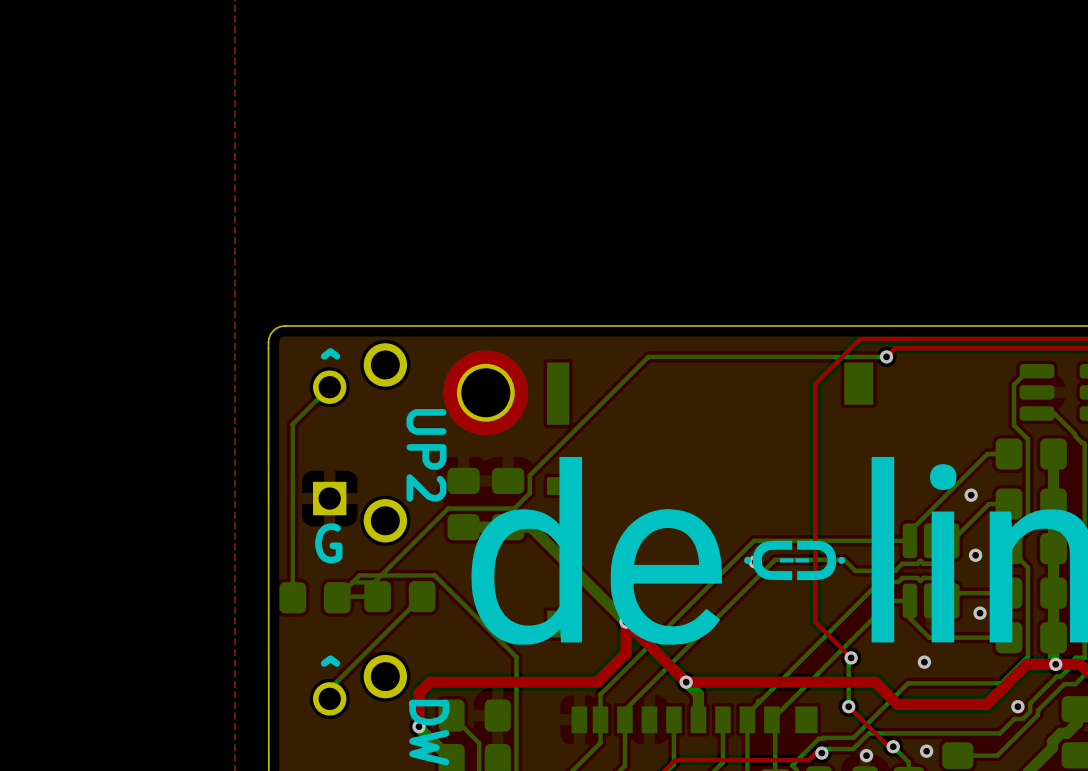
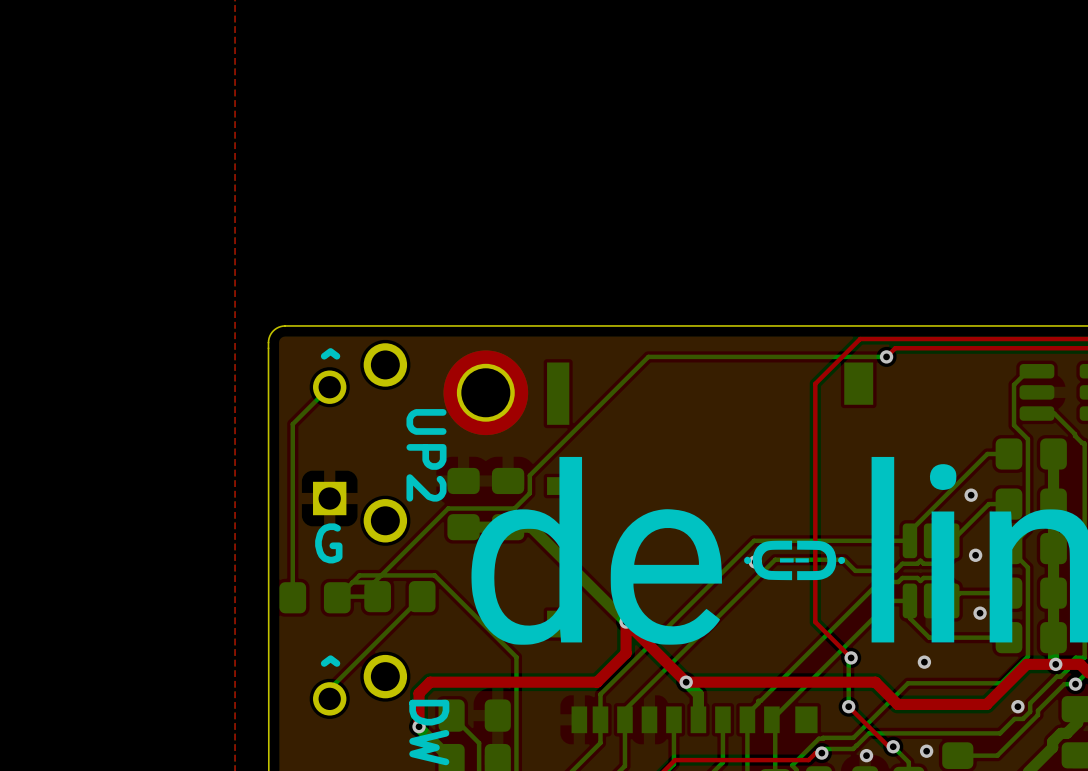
via: none -> (1075, 684)

